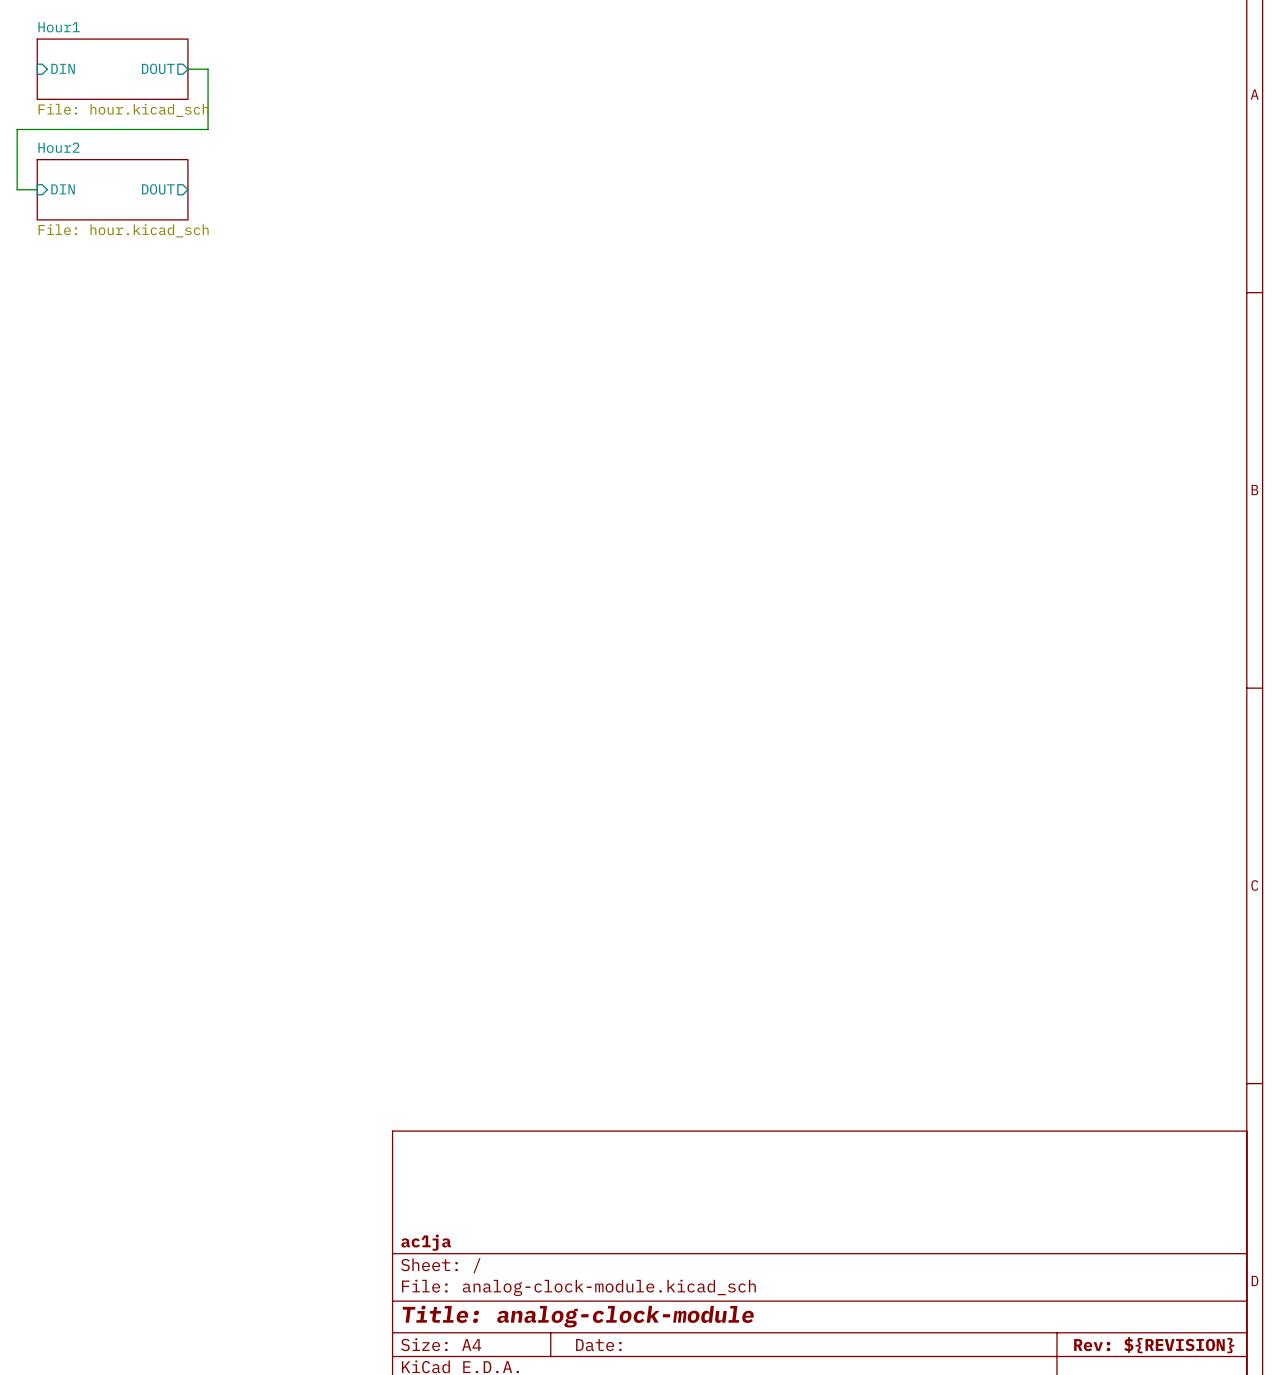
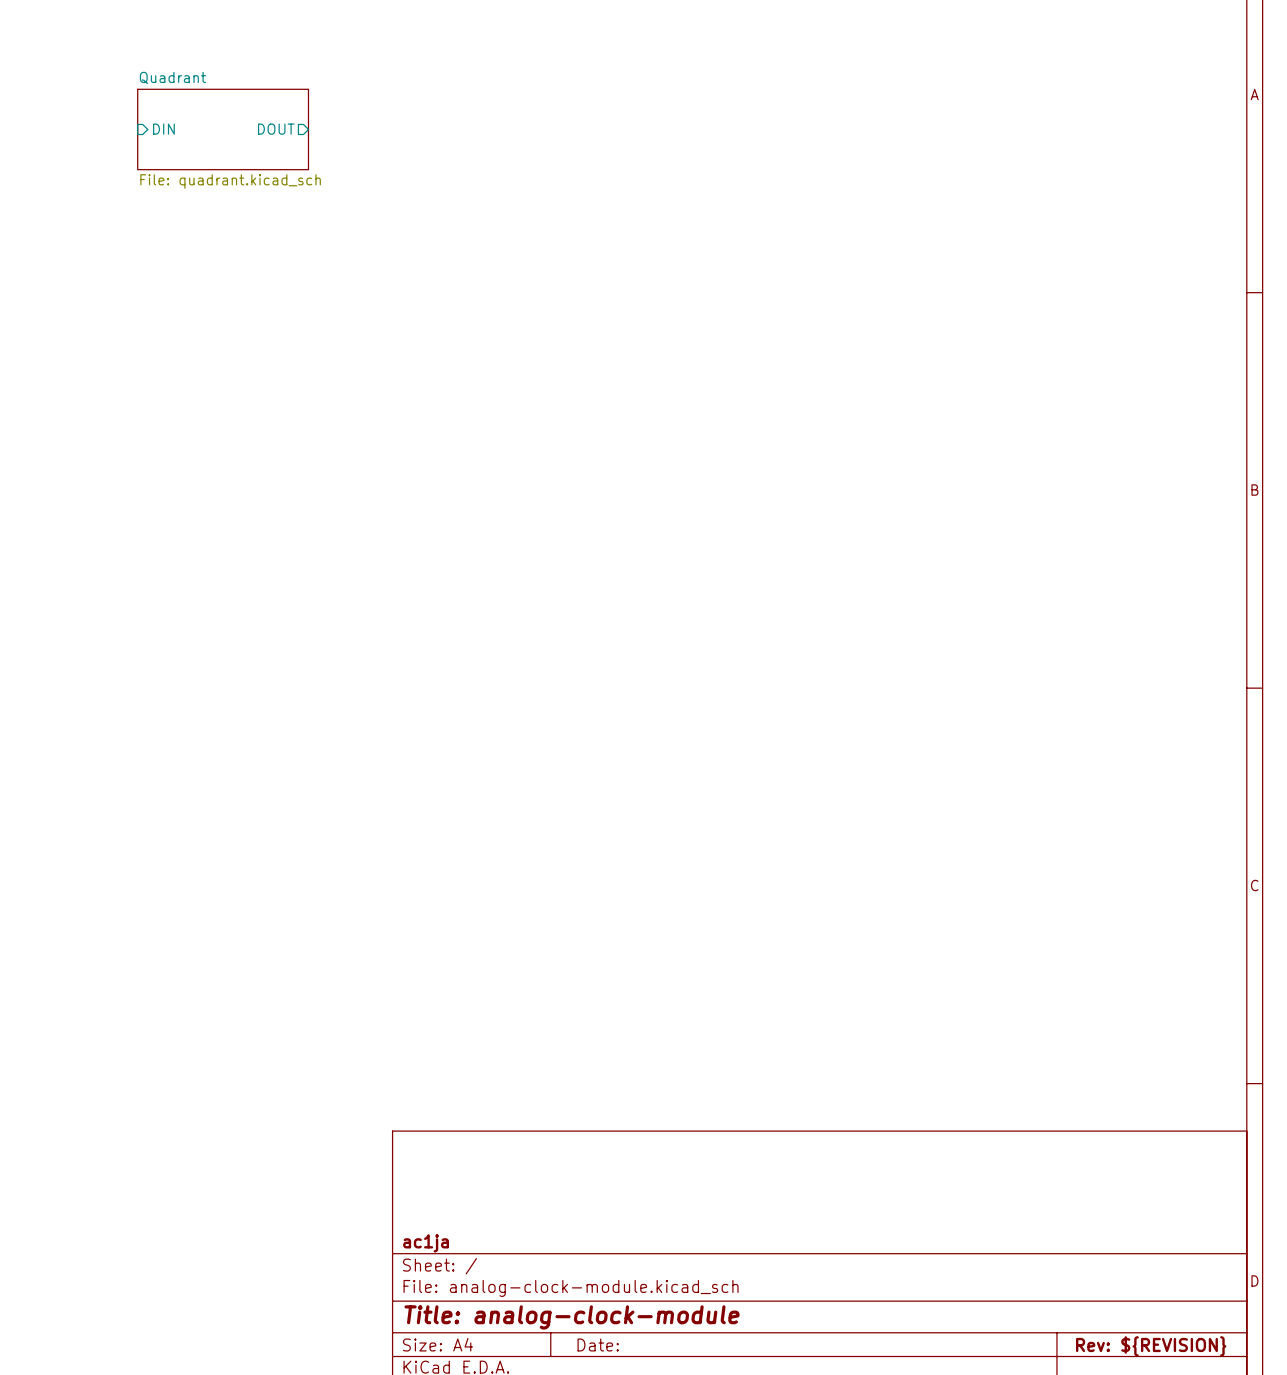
sheet pin: DIN (63, 68) -> none
sheet pin: DOUT (158, 68) -> none
sheet Hour1: File: hour.kicad_sch (112, 69) -> none
wire: (187, 69) (208, 69) (208, 129) (17, 129) (17, 189) (37, 189) -> none
sheet pin: none -> DIN (163, 129)
sheet Quadrant: none -> File: quadrant.kicad_sch (223, 129)
sheet pin: none -> DOUT (276, 129)
sheet pin: DIN (63, 189) -> none
sheet Hour2: File: hour.kicad_sch (112, 189) -> none
sheet pin: DOUT (158, 189) -> none

